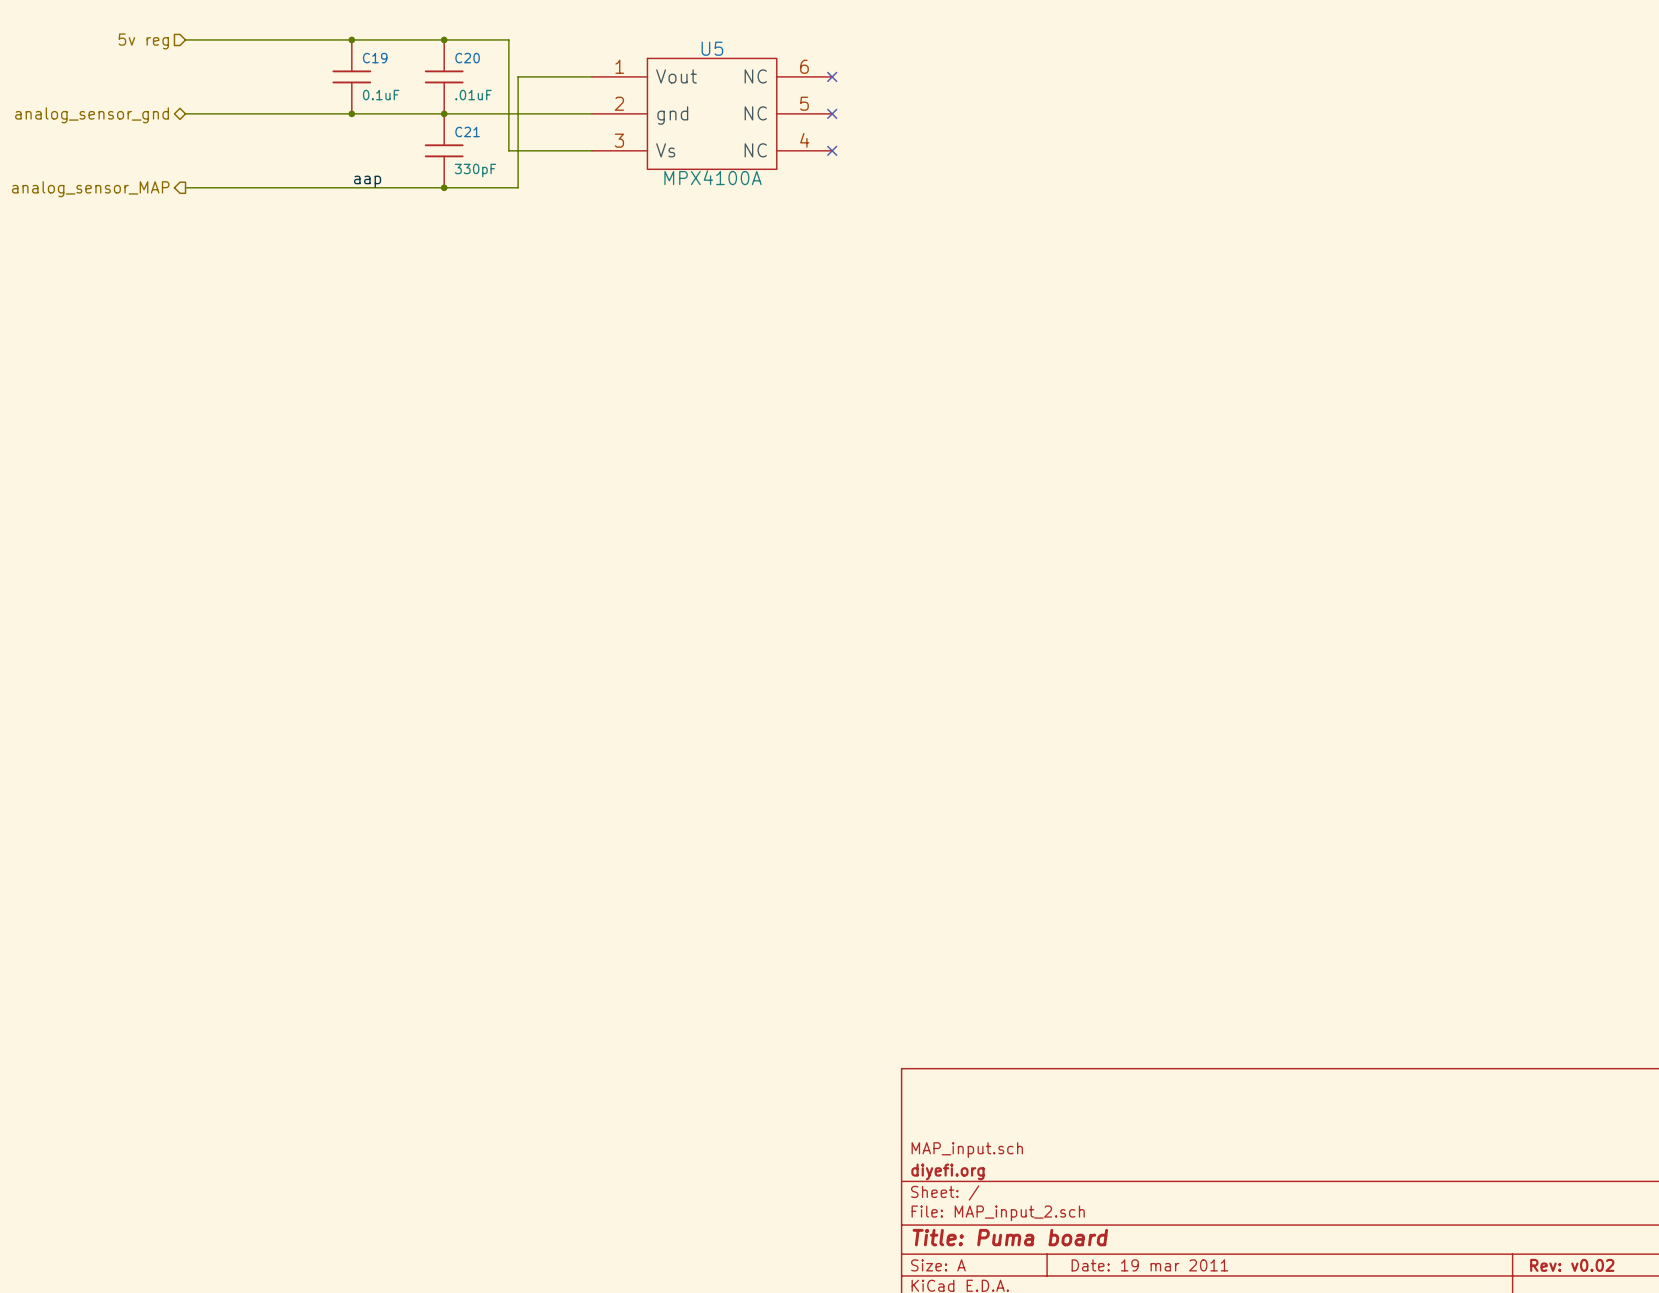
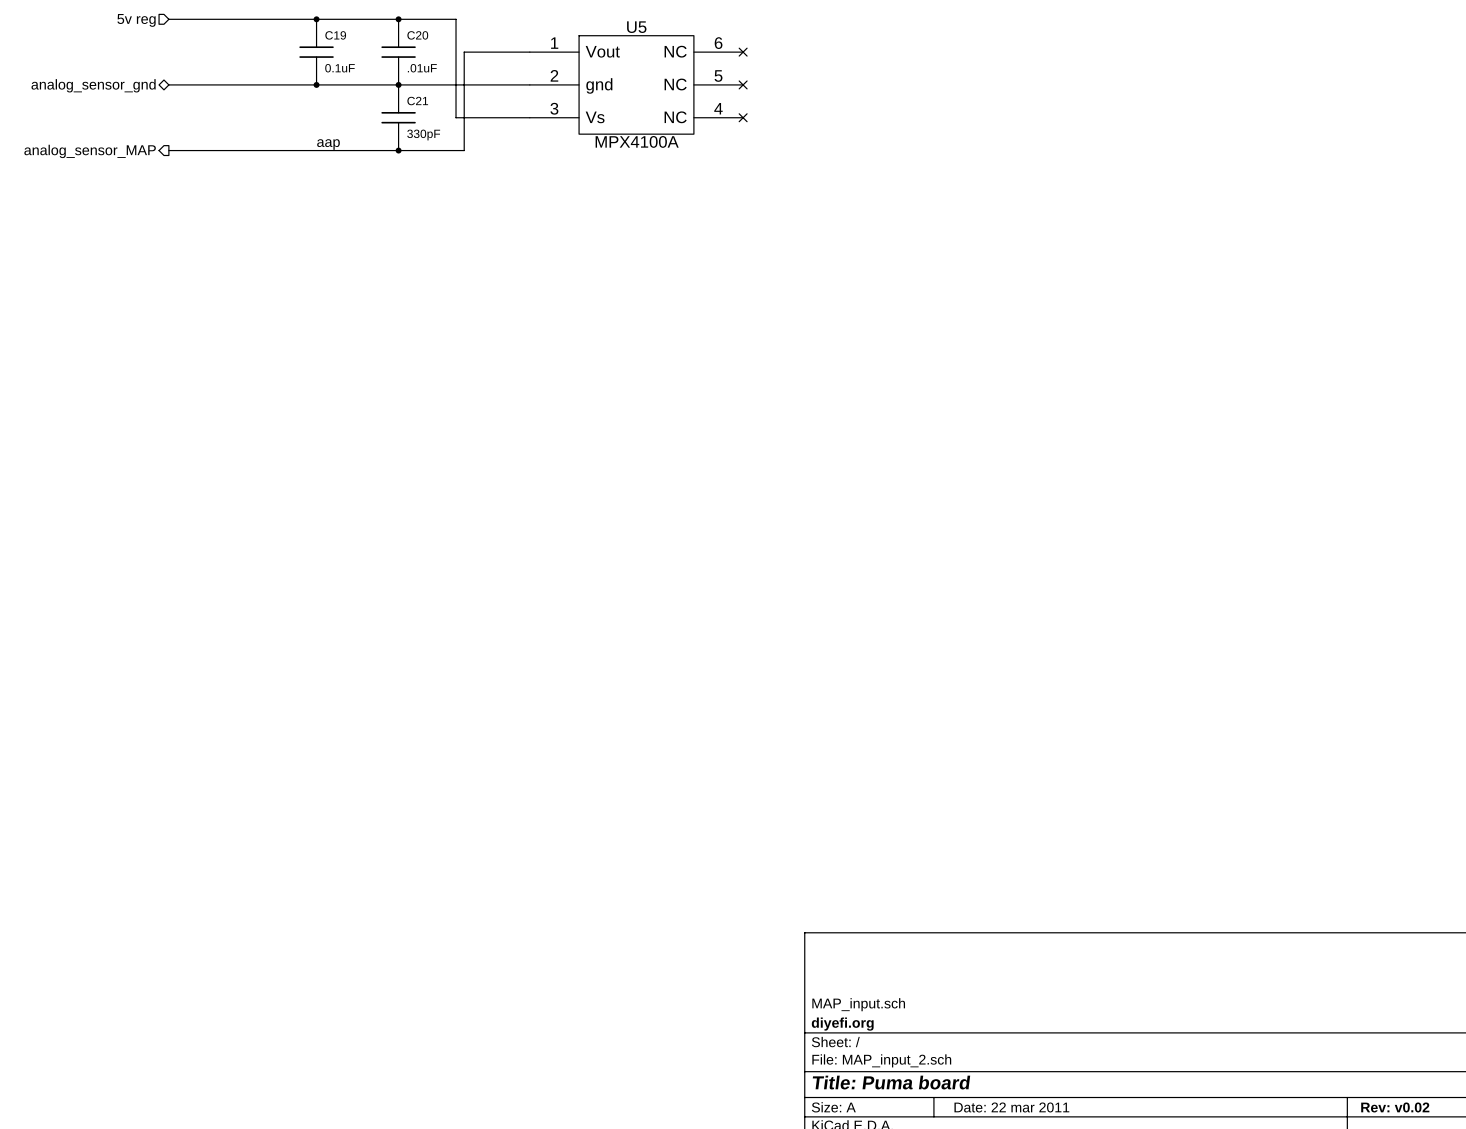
title block: Date: 19 mar 2011 (1149, 1265) -> Date: 22 mar 2011 (1011, 1107)

